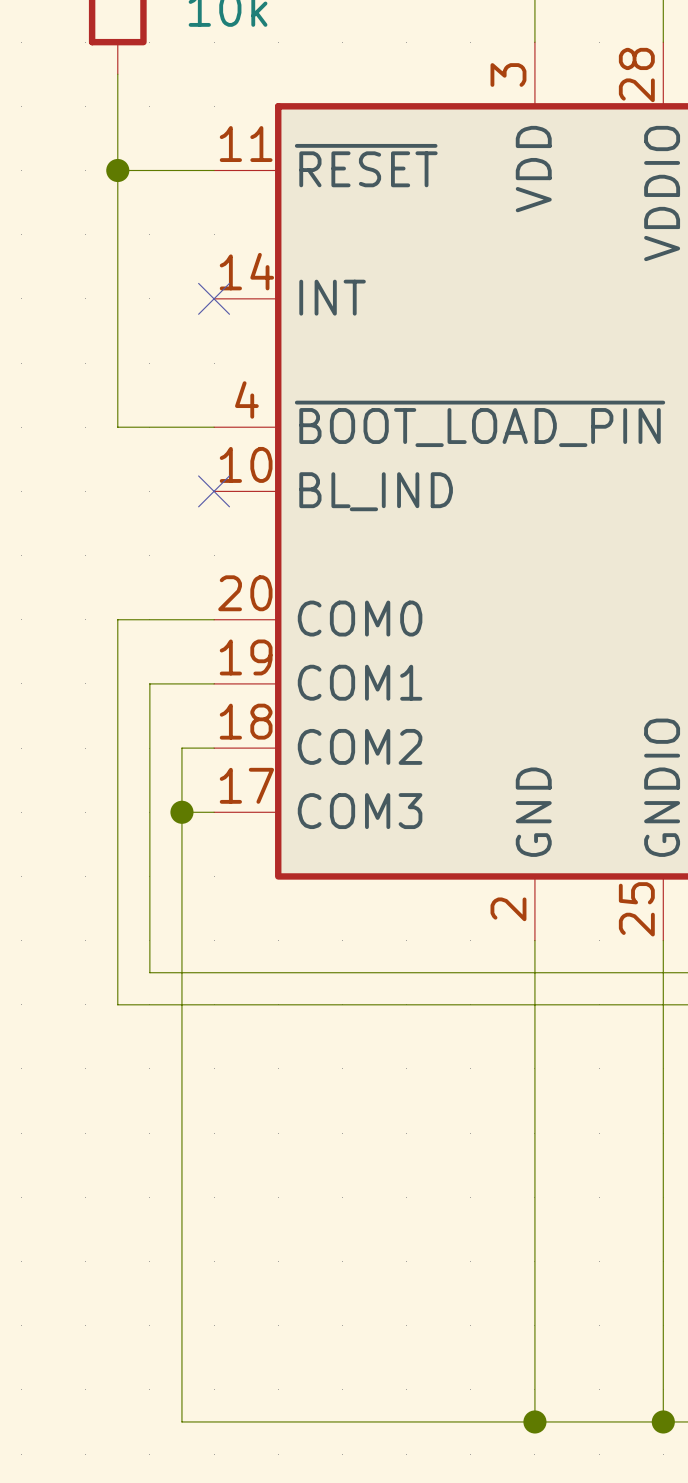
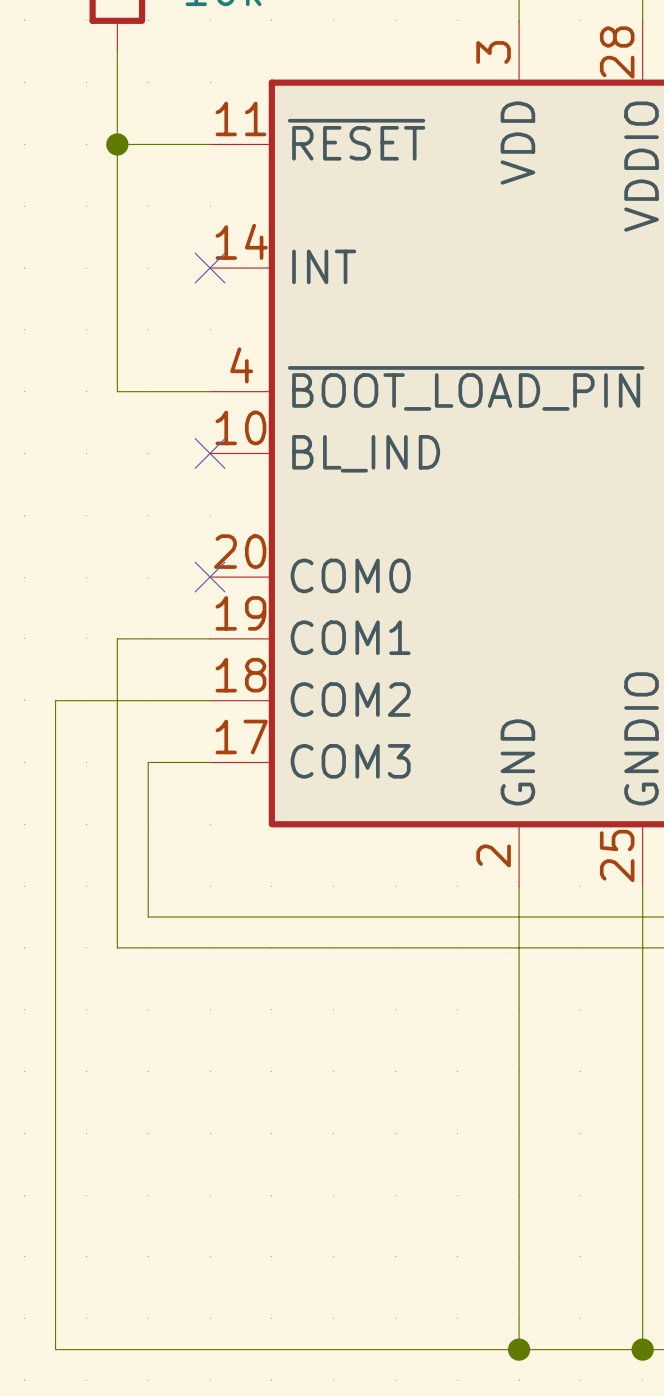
wire: (214, 619) (117, 619) (117, 683) -> (148, 638) (117, 638)
no-connect mark: none -> (210, 577)
wire: (149, 683) (149, 812) -> (179, 762) (148, 762)
wire: (181, 748) (181, 1421) -> (179, 700) (55, 700) (55, 1349) (179, 1349)
junction: (181, 812) -> none

